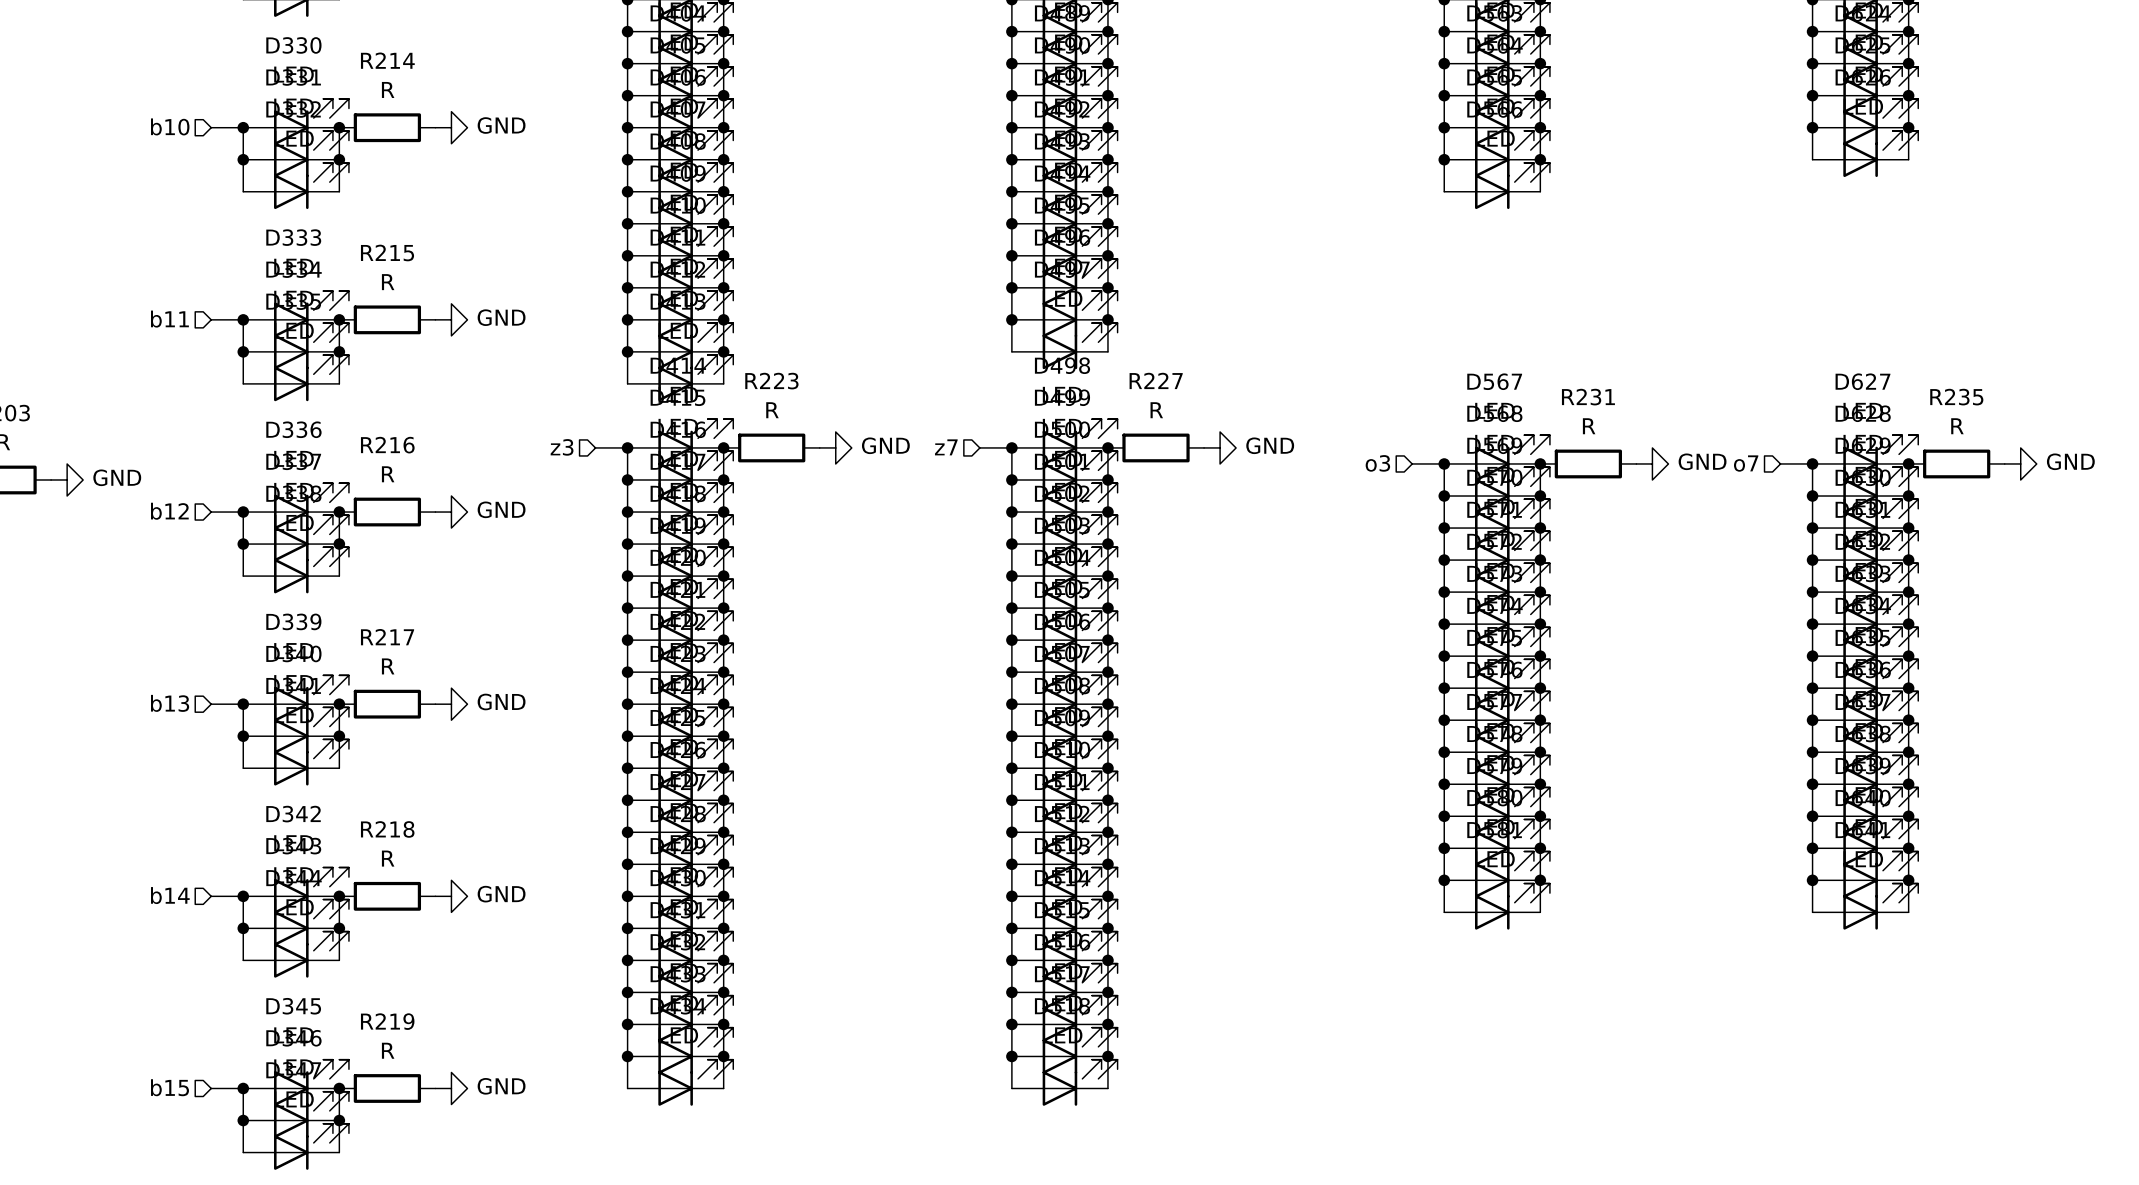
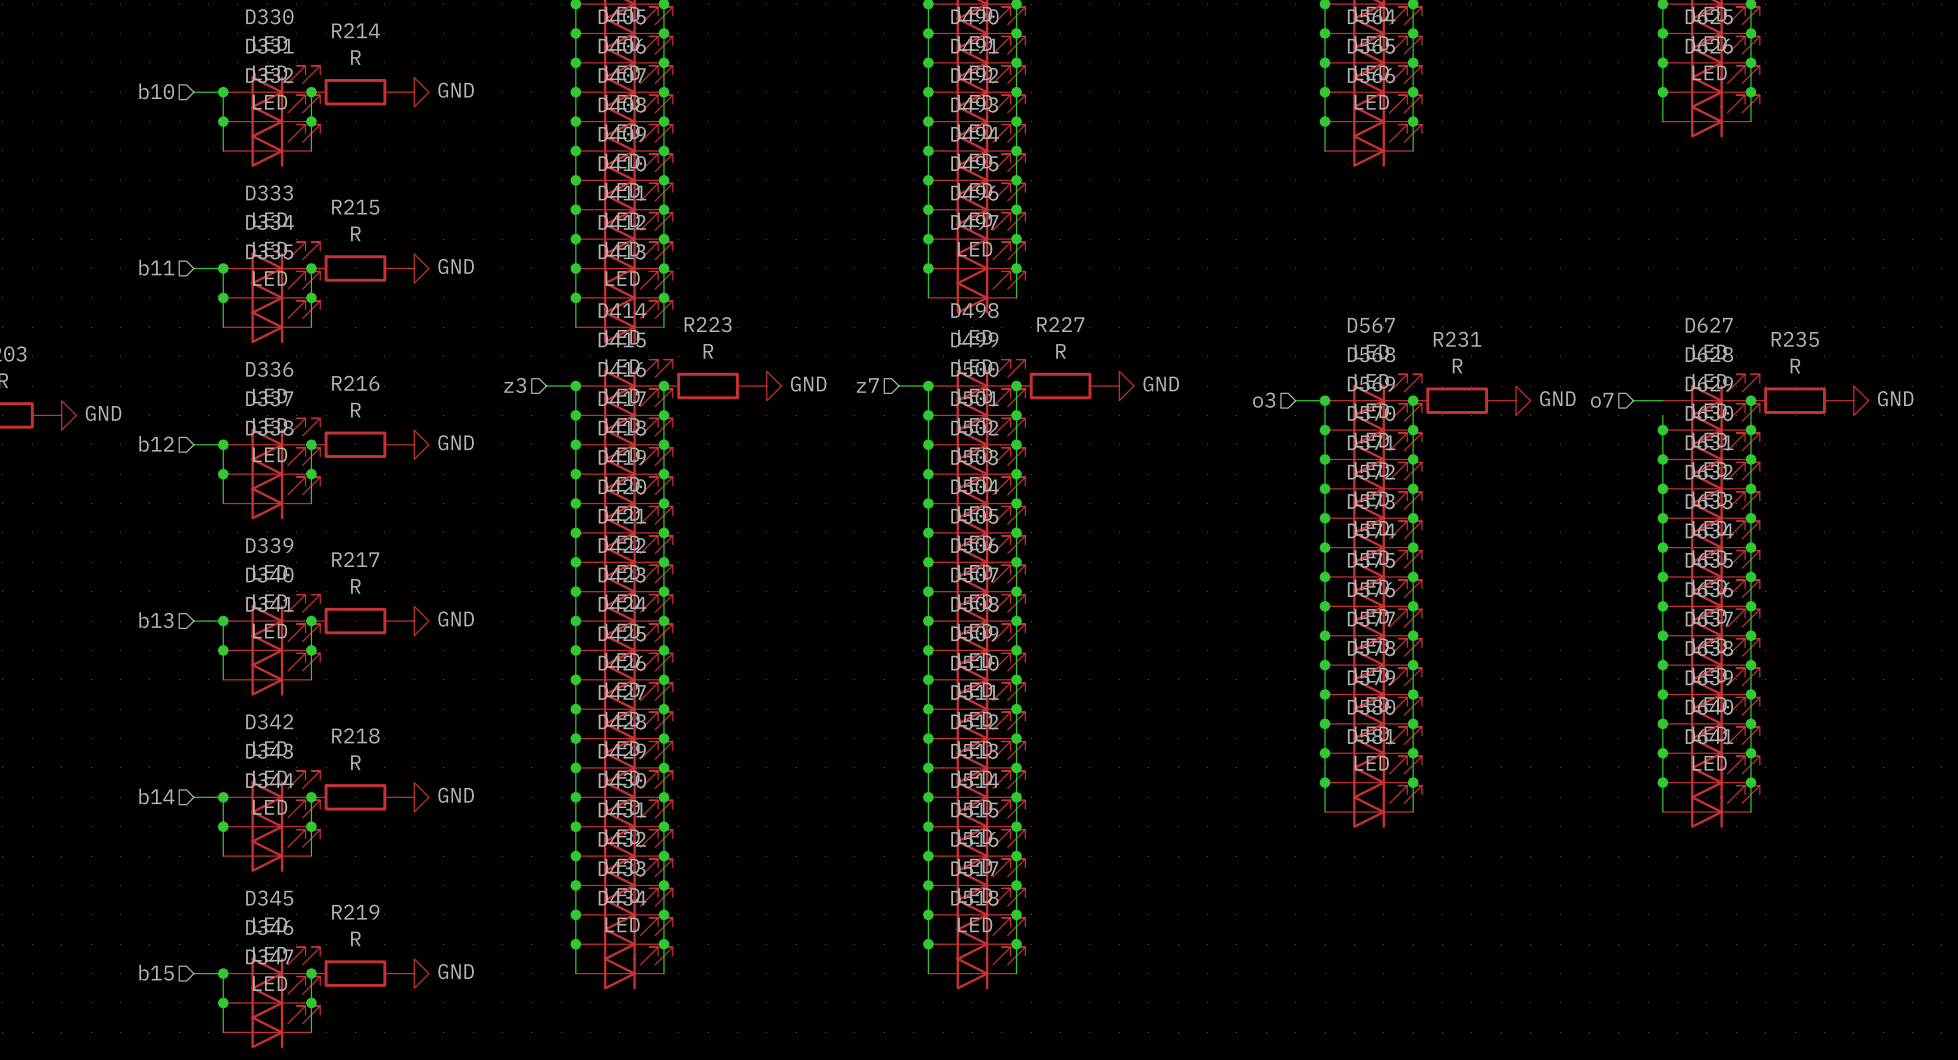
wire: (1812, 463) (1812, 479) -> none
junction: (1812, 463) -> none

